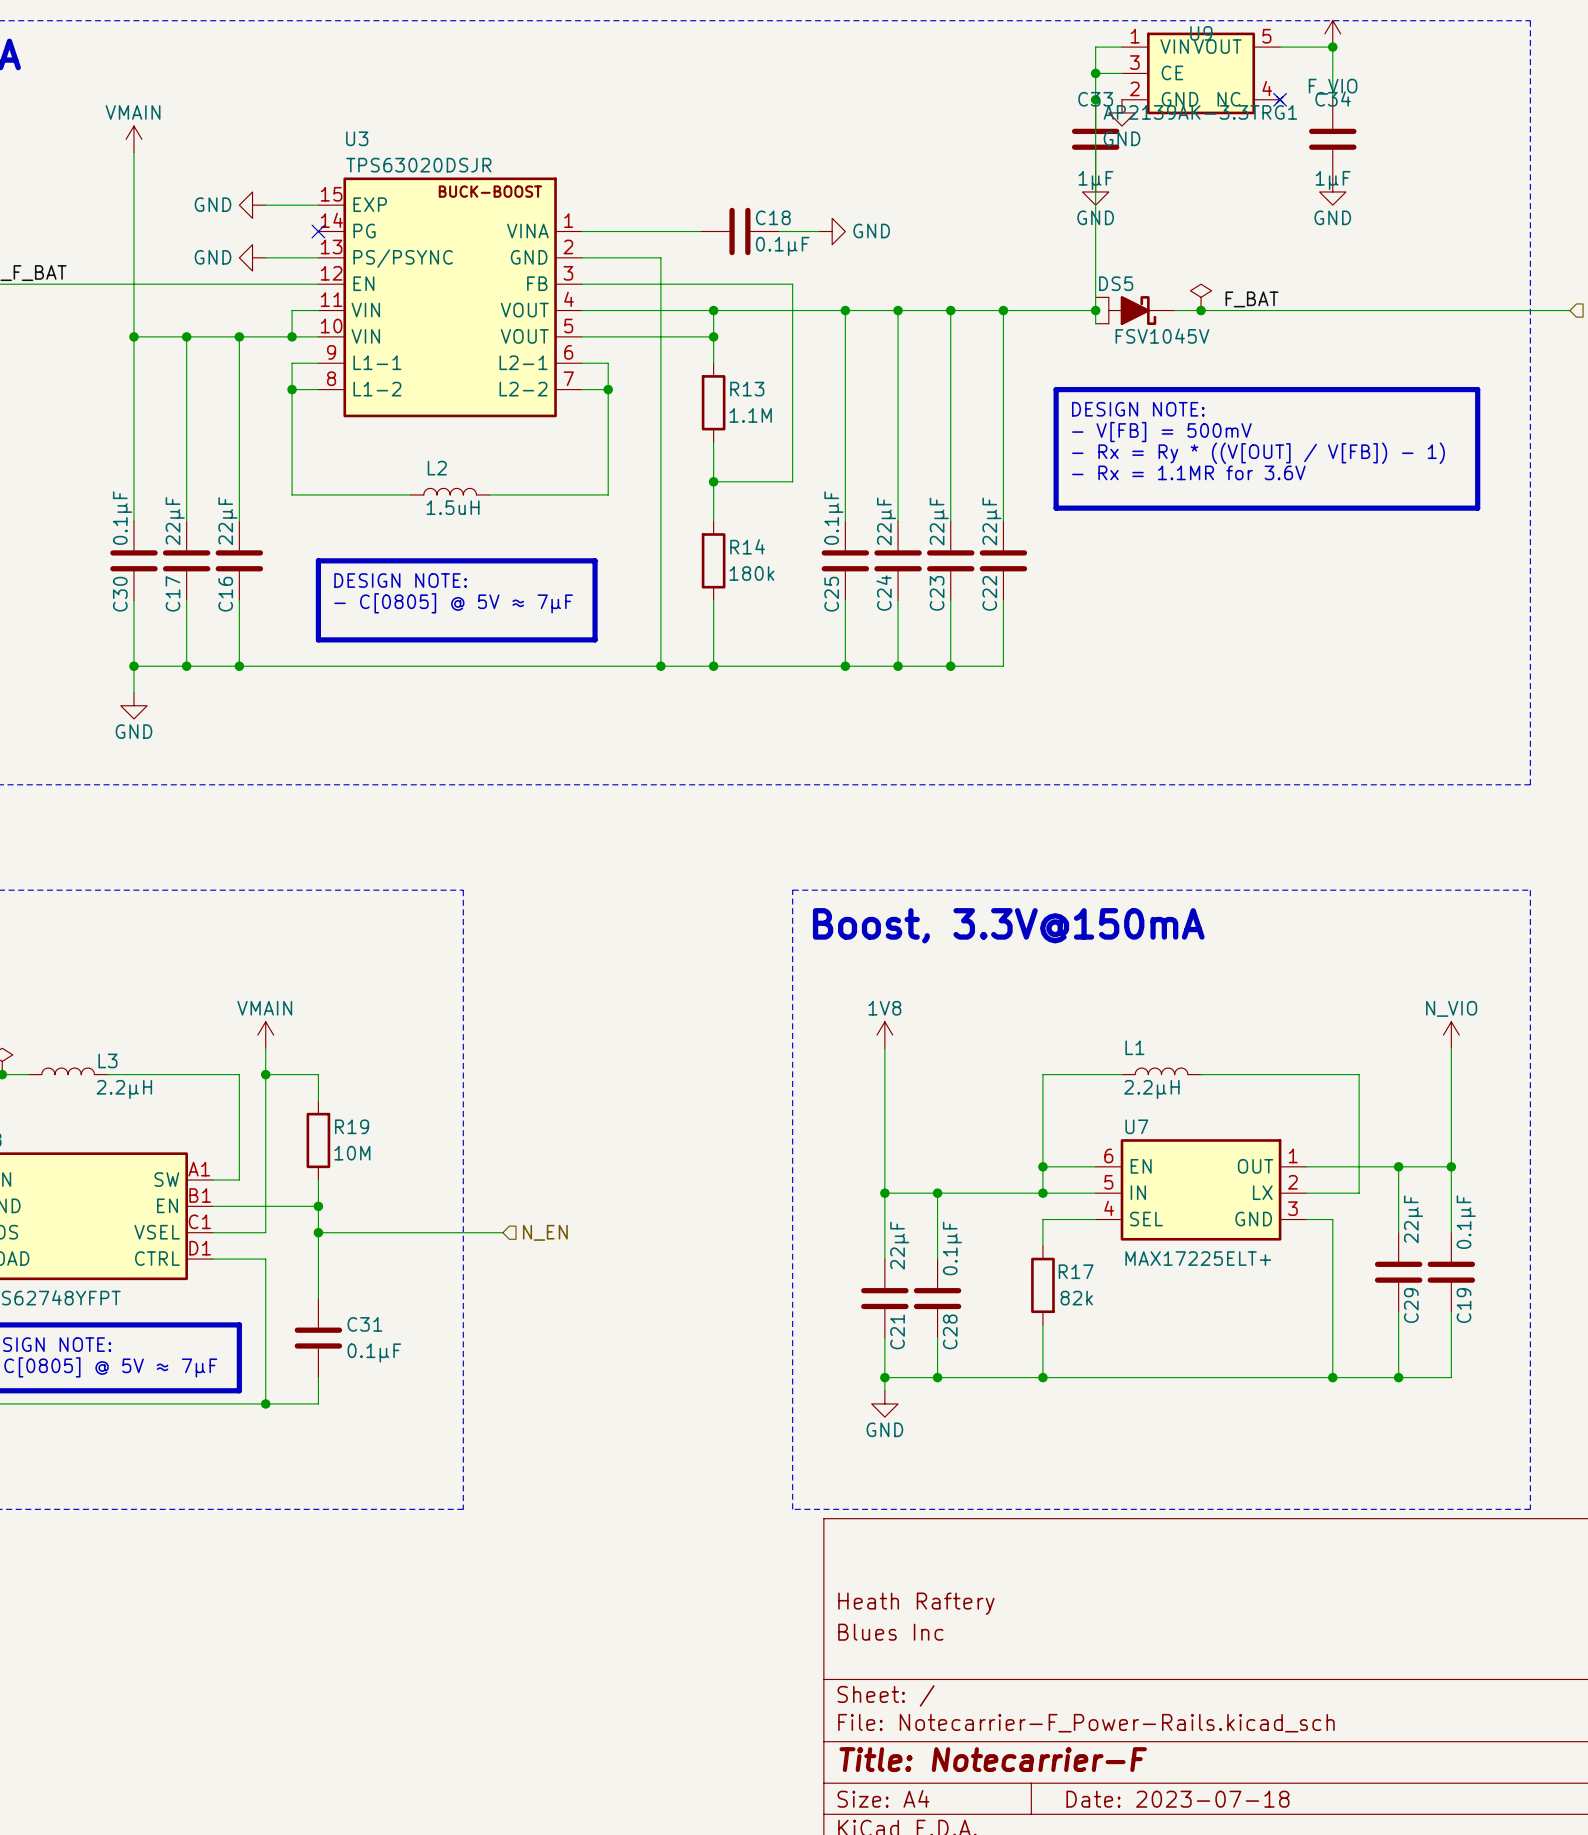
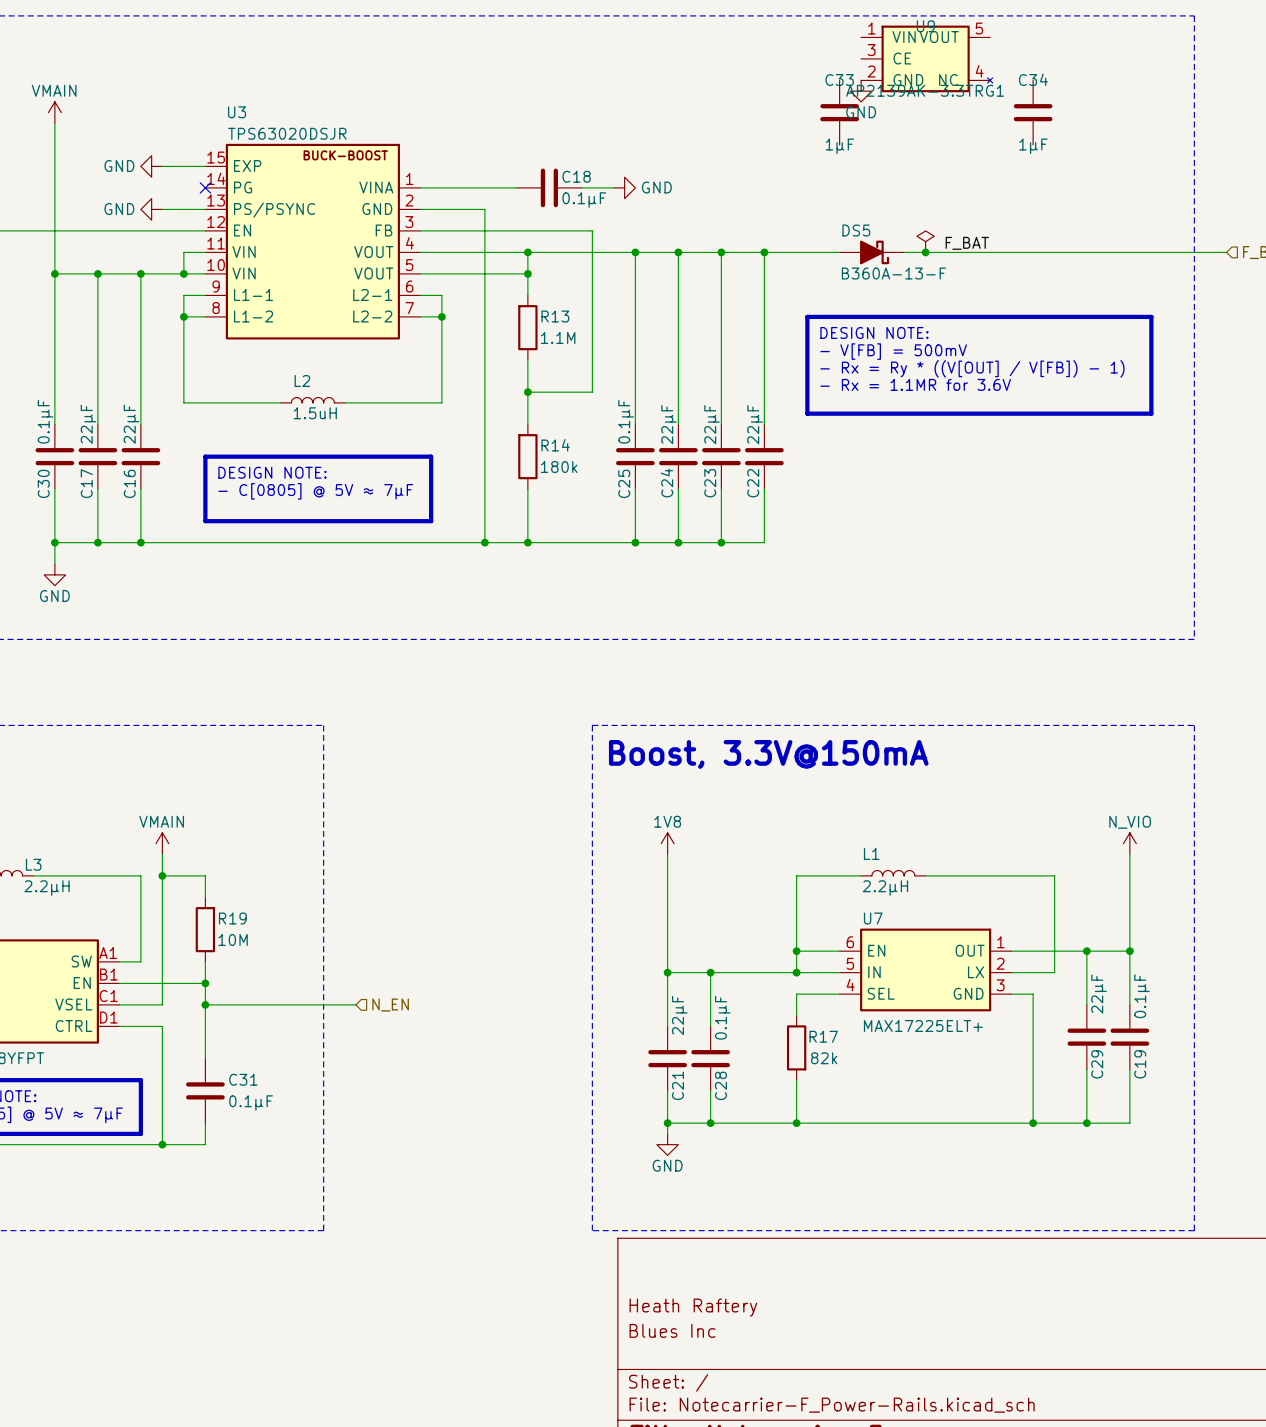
power symbol: F_VIO (1332, 33) -> none
wire: (1121, 47) (1095, 47) (1095, 323) -> none
wire: (1280, 47) (1332, 47) (1332, 99) -> none
junction: (1332, 47) -> none
wire: (1095, 73) (1121, 73) -> none
junction: (1095, 73) -> none
junction: (1095, 99) -> none
no-connect mark: (1280, 99) -> none
power symbol: GND (1095, 191) -> none
power symbol: GND (1332, 191) -> none
DS5 symbol: [1095, 296, 1175, 326] -> [839, 240, 905, 265]
junction: (1095, 310) -> none
DS5 value: FSV1045V (1162, 336) -> B360A-13-F (893, 273)

